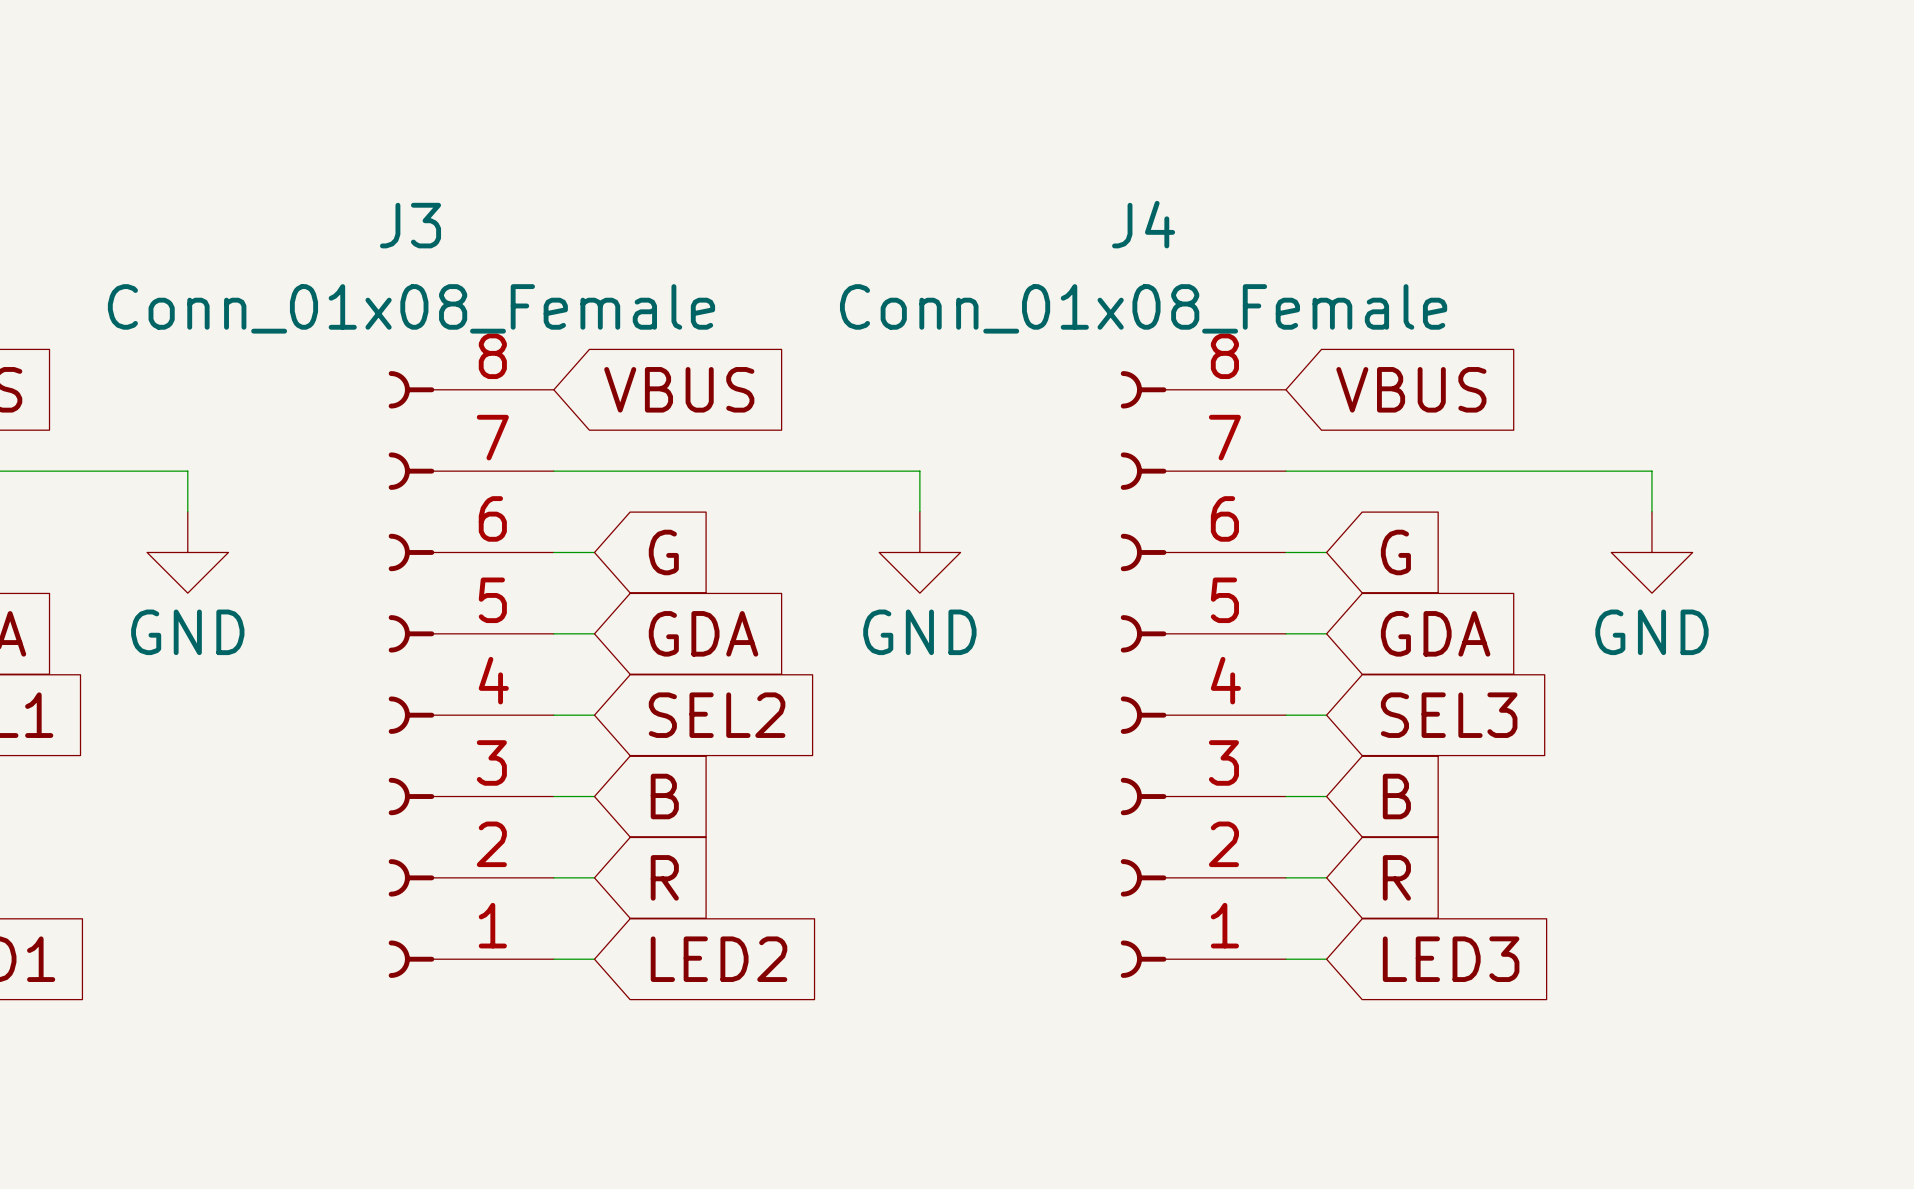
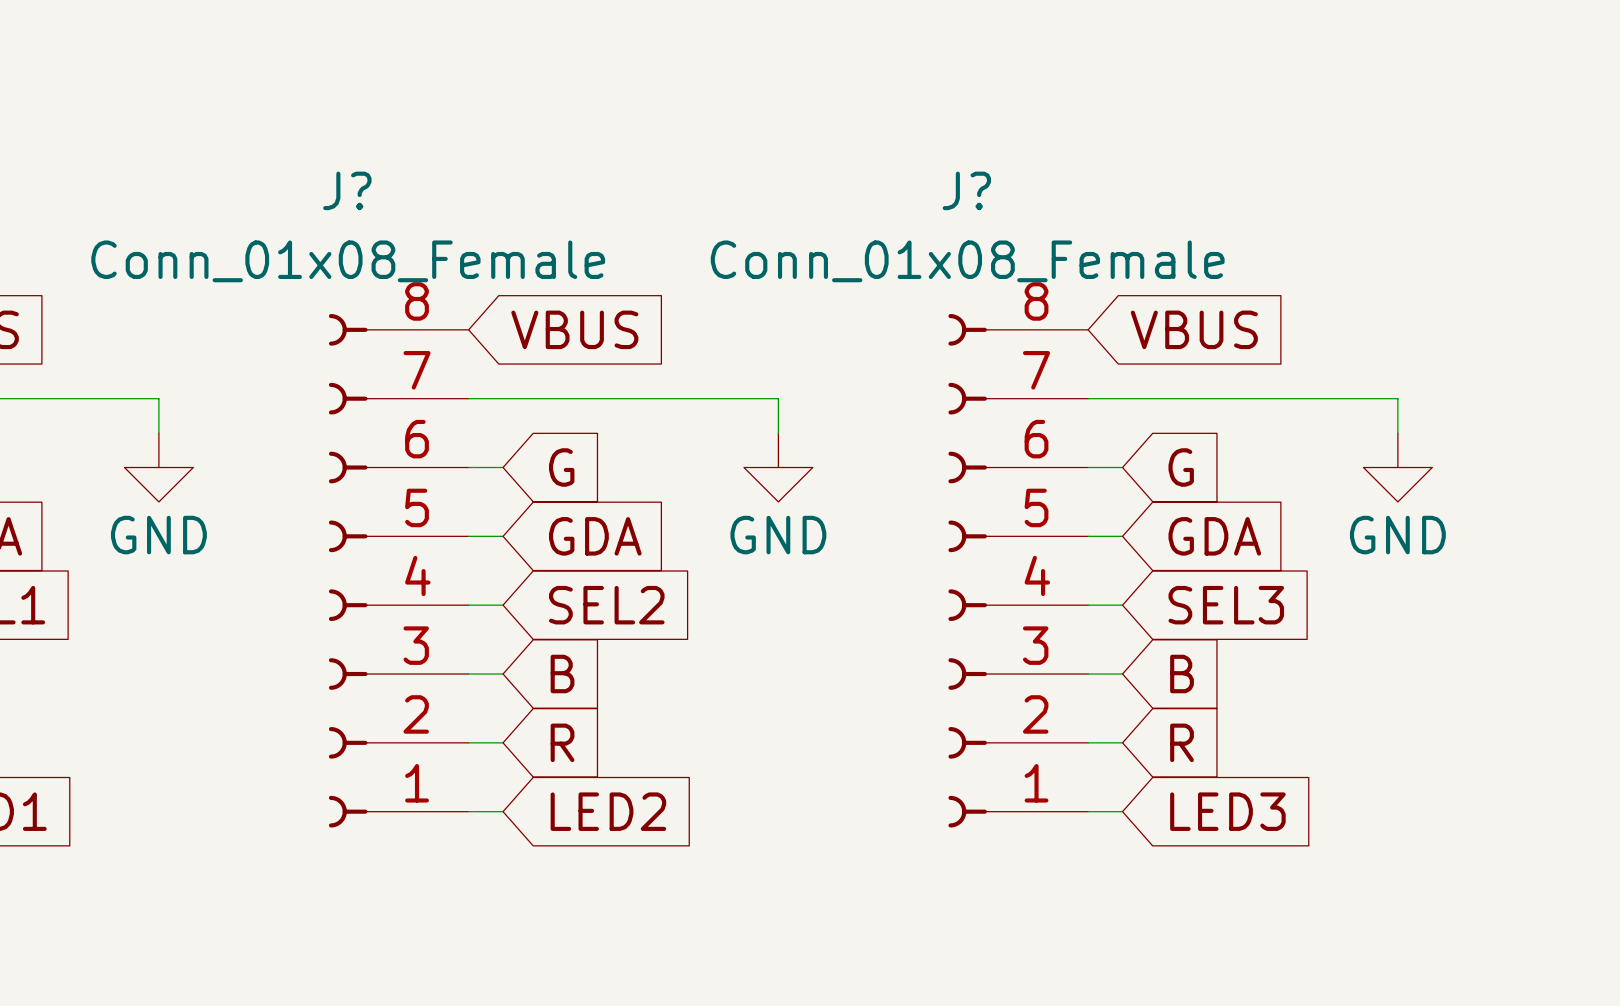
J4 name: J4 (1143, 224) -> J? (966, 190)
J3 name: J3 (410, 225) -> J? (347, 190)

